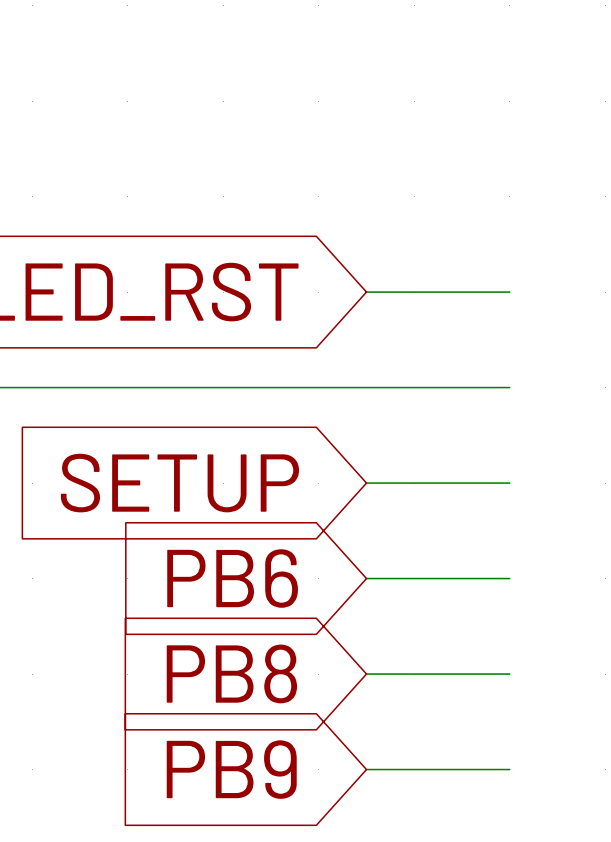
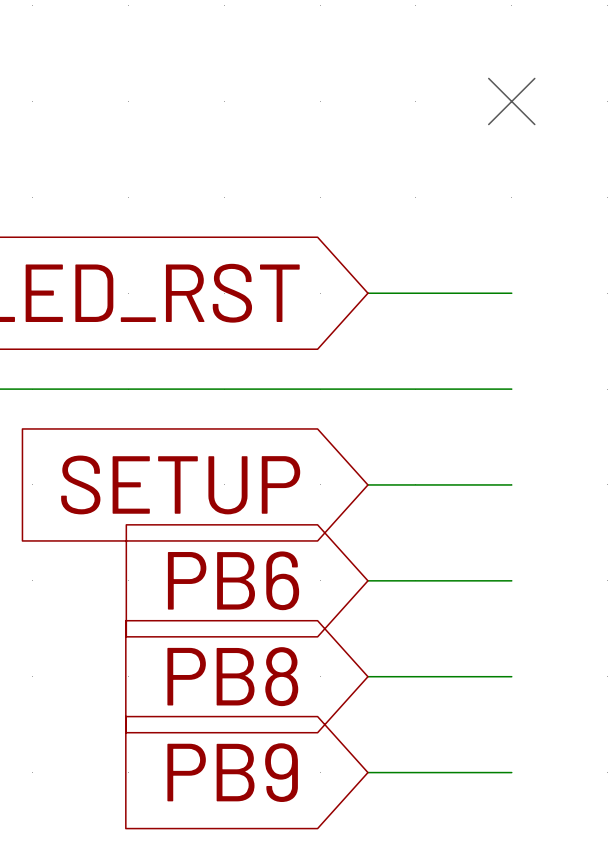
no-connect mark: none -> (511, 101)

